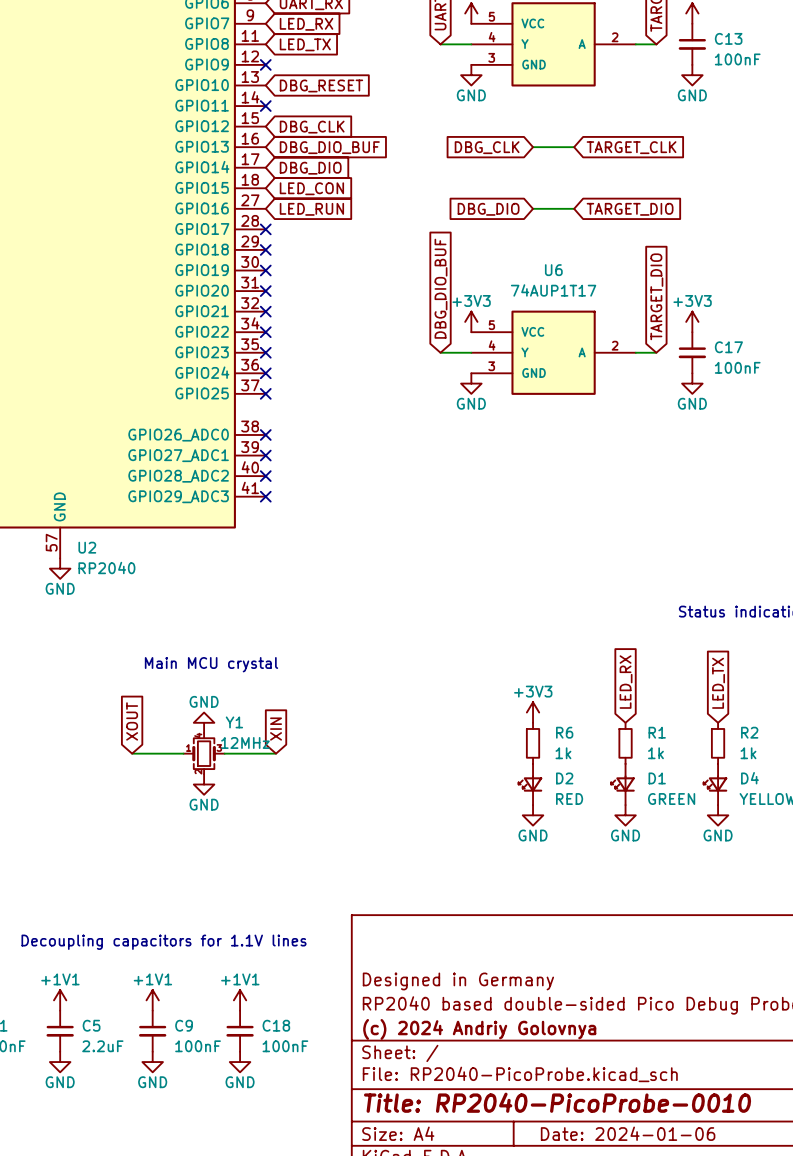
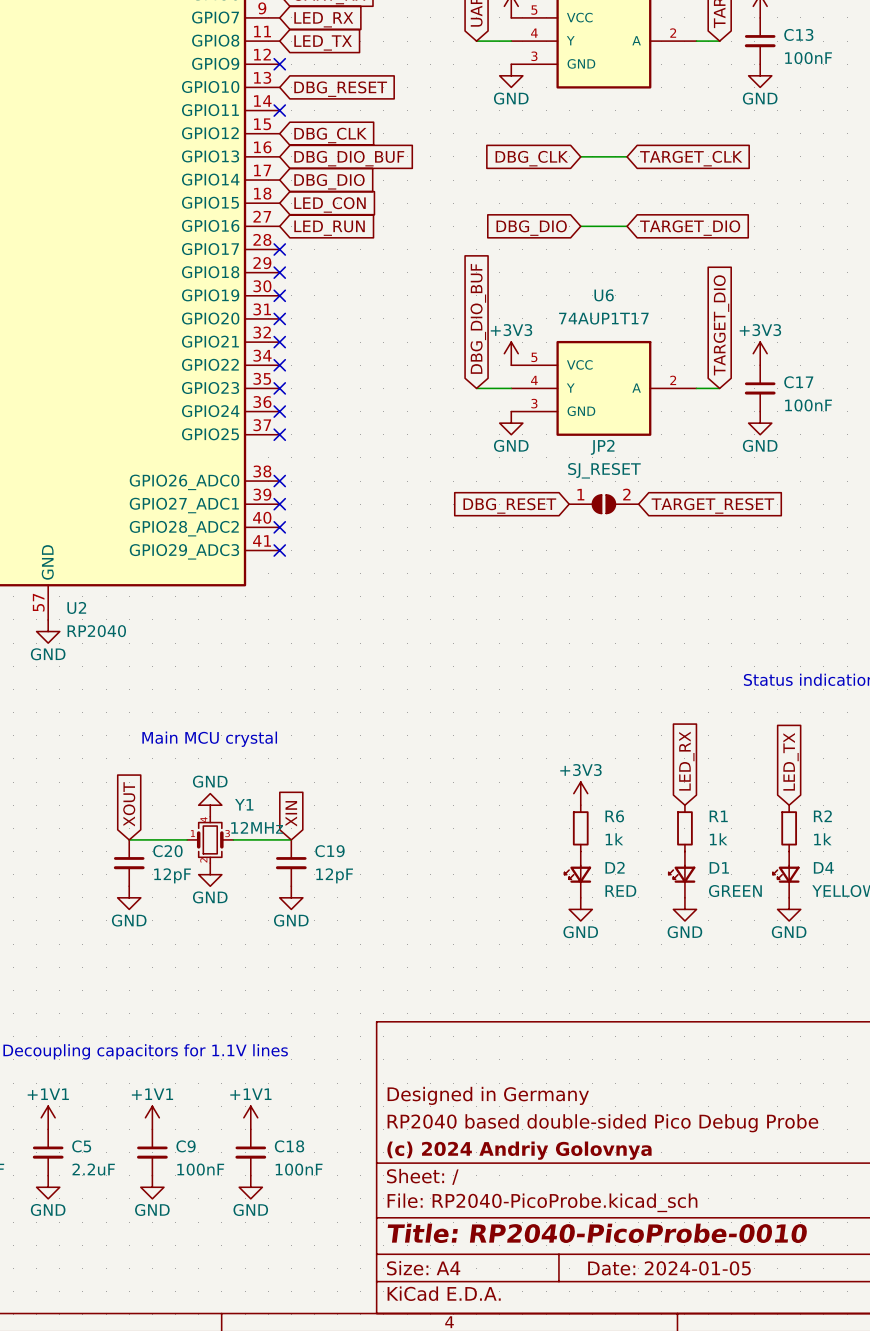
JP2: none -> SJ_RESET (603, 504)
global label: none -> DBG_RESET (509, 505)
global label: none -> TARGET_RESET (712, 505)
C20: none -> 12pF (129, 863)
C19: none -> 12pF (291, 863)
power symbol: none -> GND (129, 897)
power symbol: none -> GND (291, 897)
title block: Date: 2024-01-06 (628, 1133) -> Date: 2024-01-05 (669, 1268)

